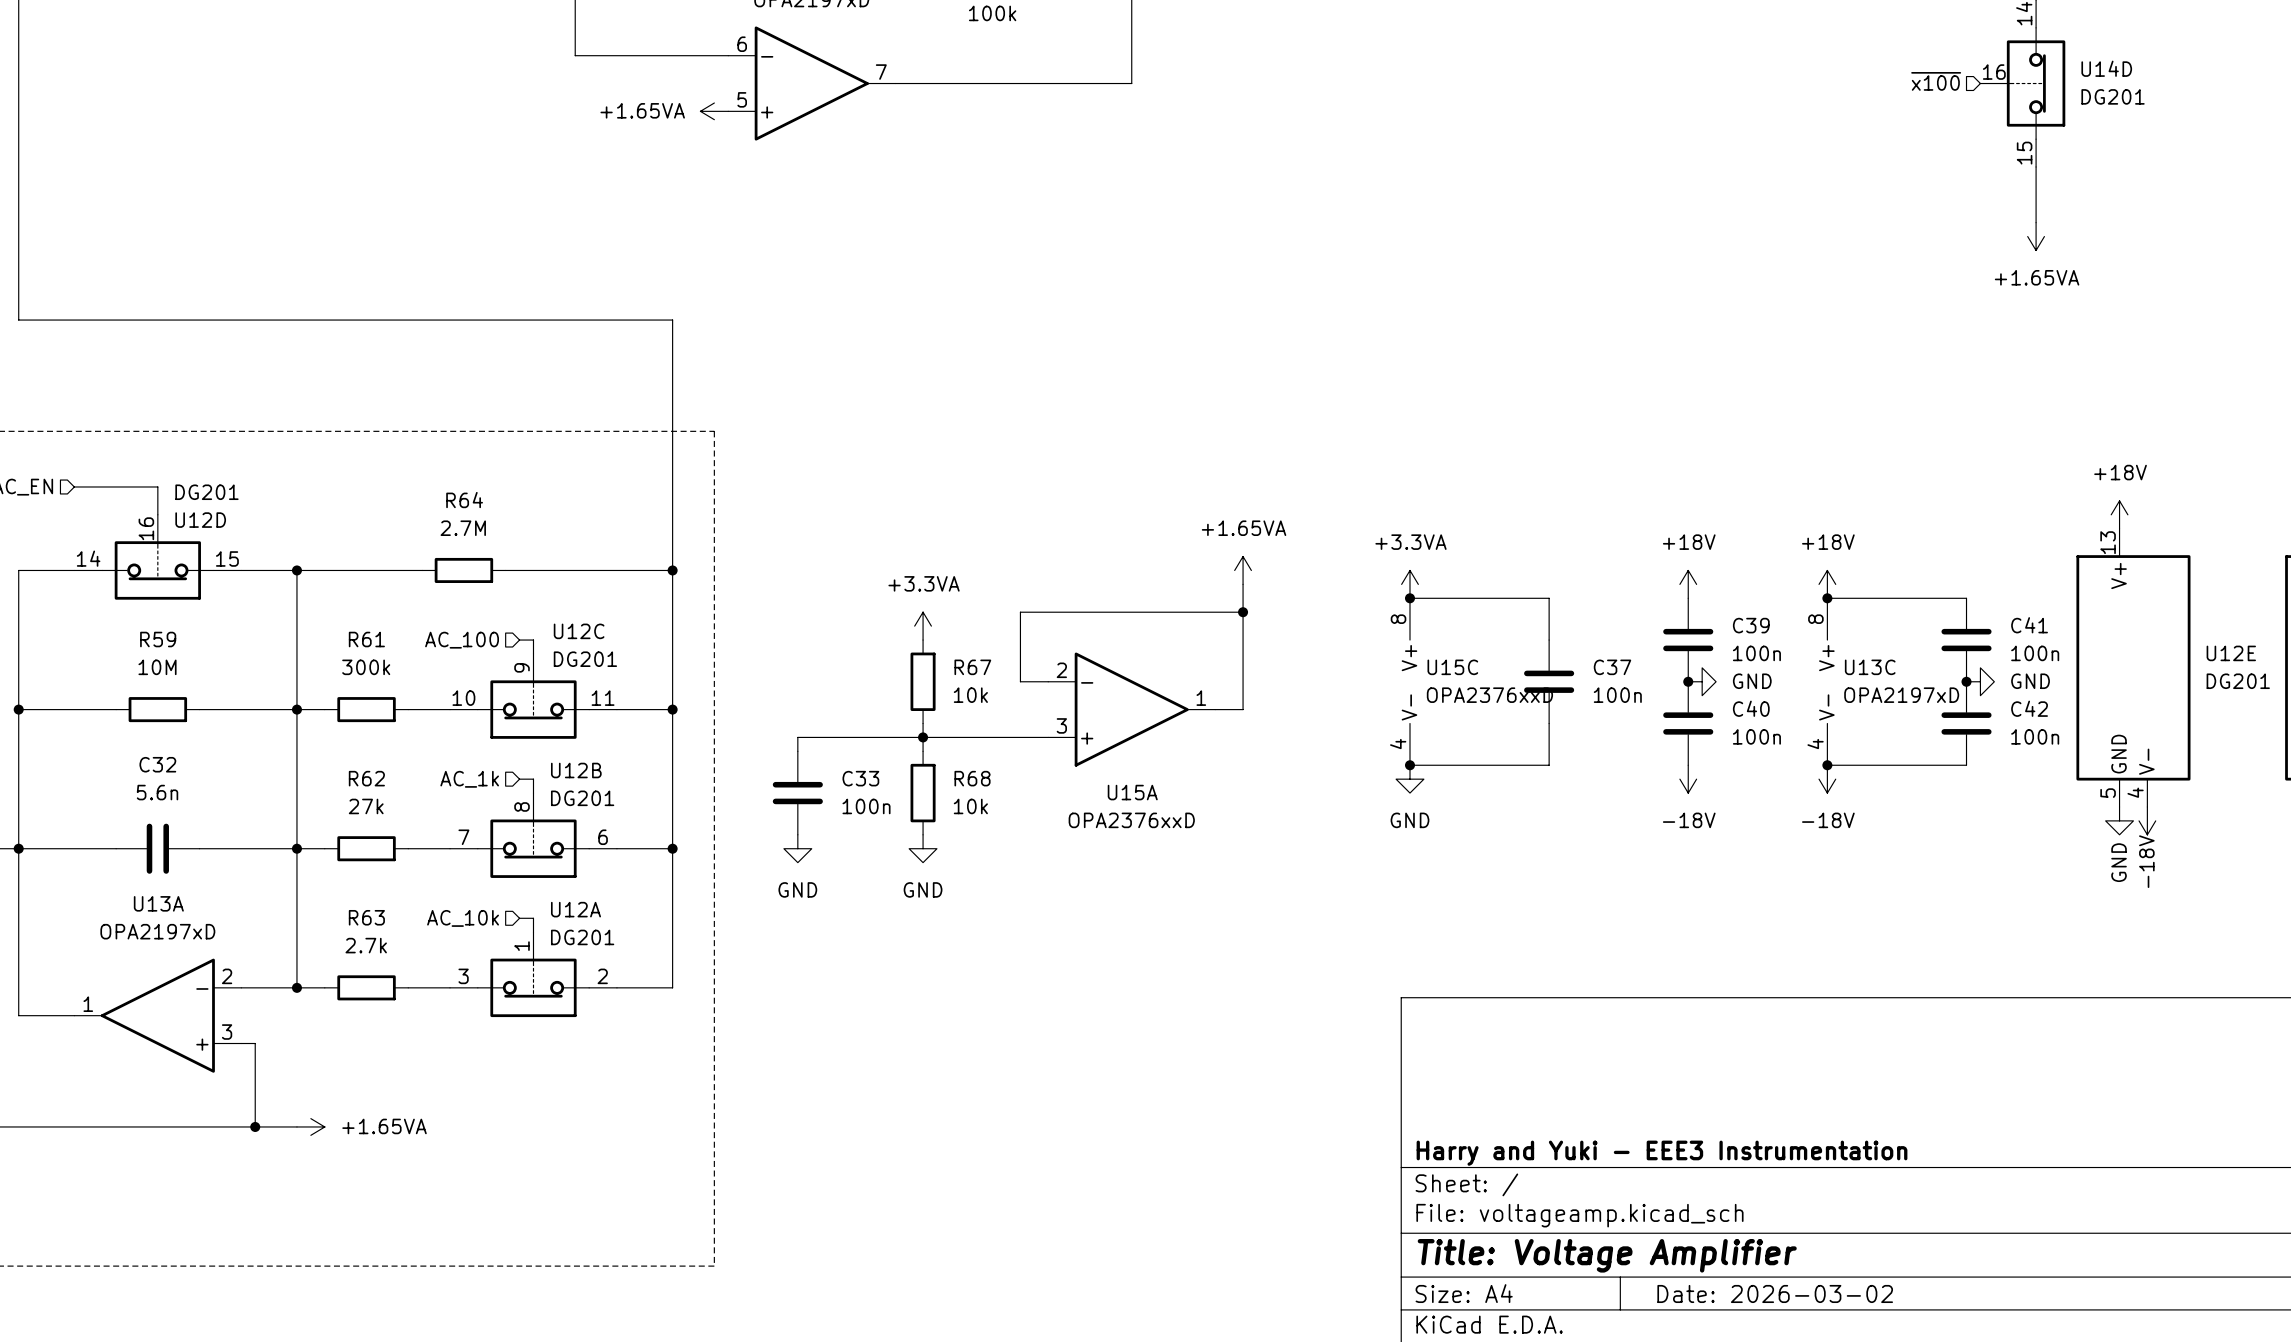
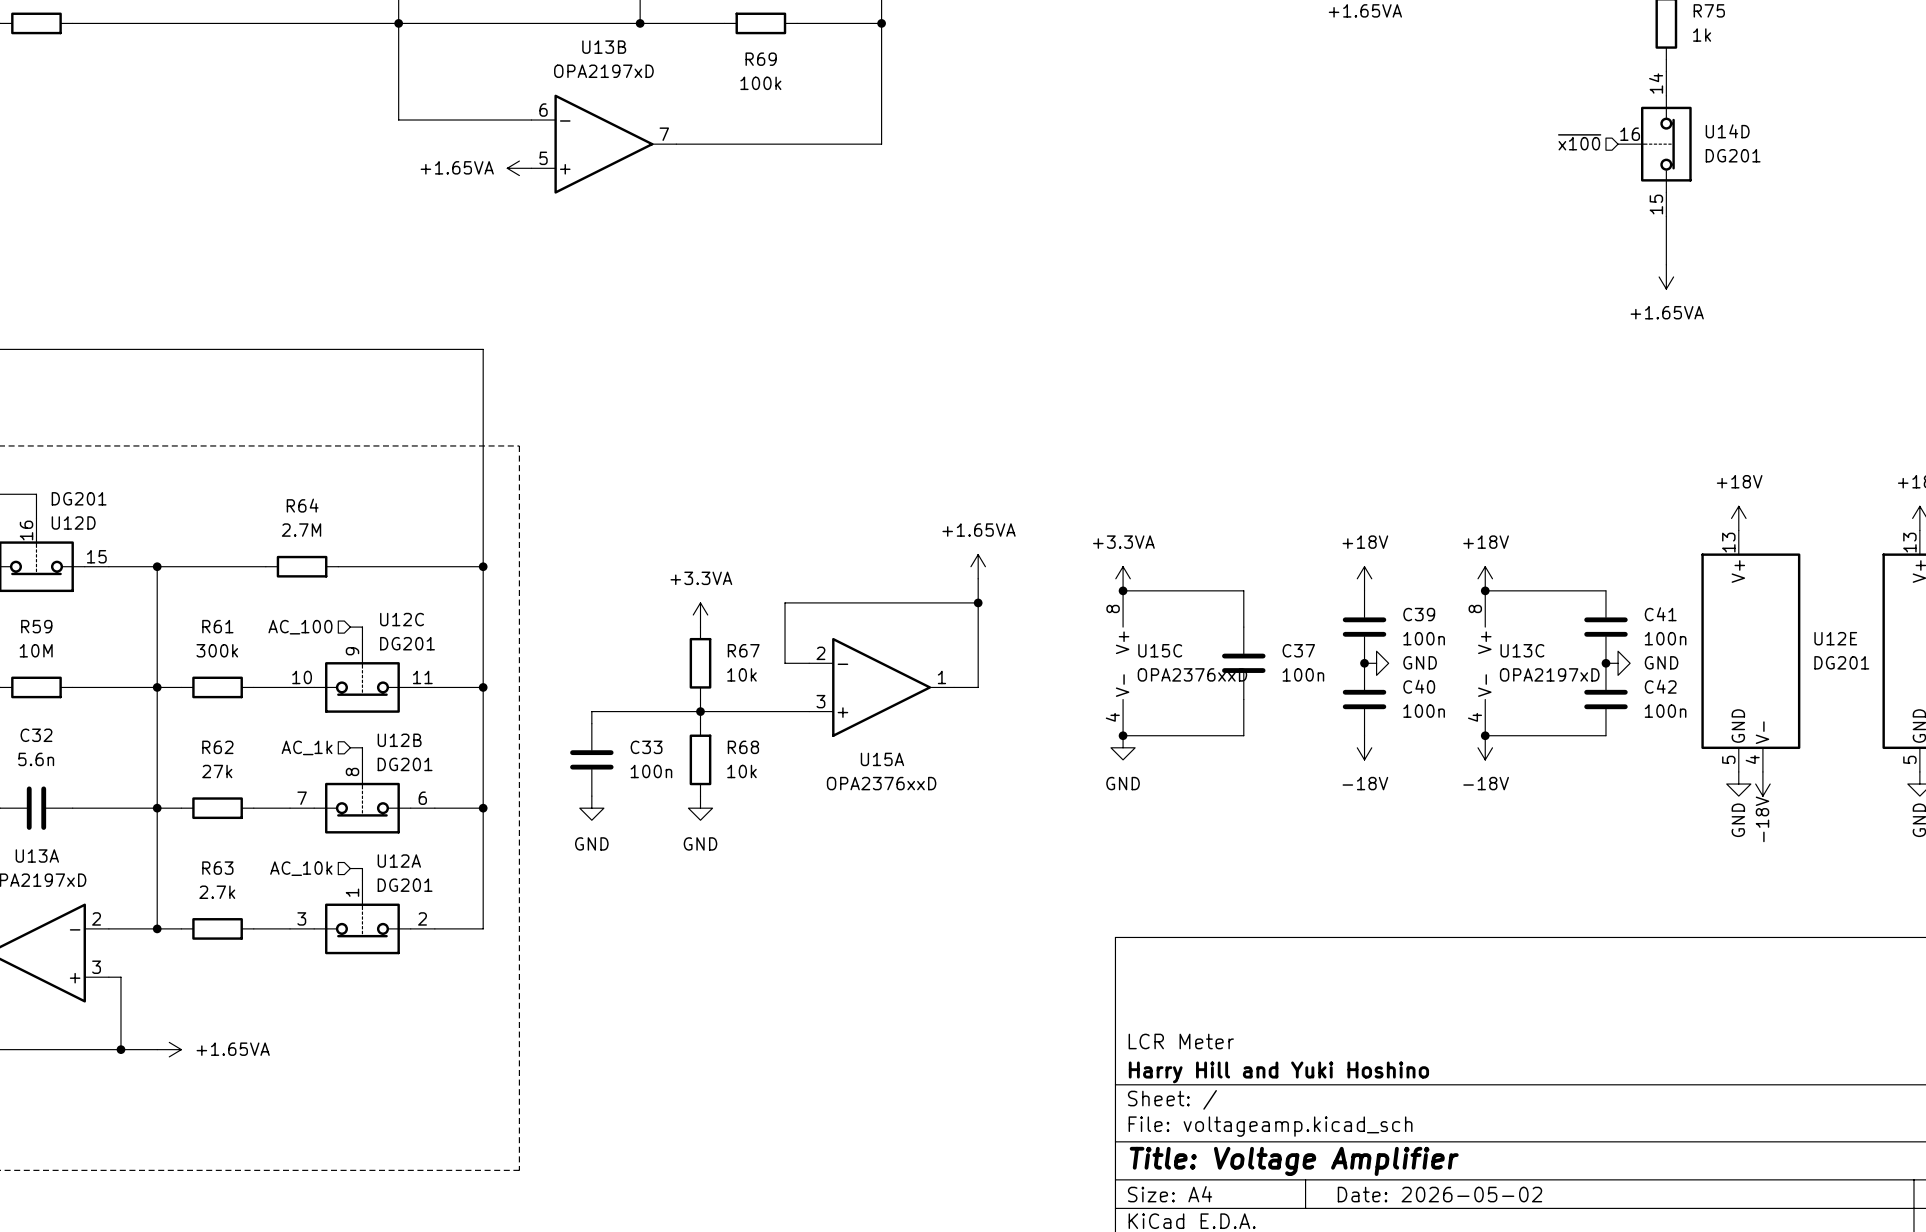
title block: none -> LCR Meter (1181, 1041)
title block: Harry and Yuki - EEE3 Instrumentation (1662, 1153) -> Harry Hill and Yuki Hoshino (1278, 1072)
title block: Date: 2026-03-02 (1775, 1293) -> Date: 2026-05-02 (1439, 1194)

